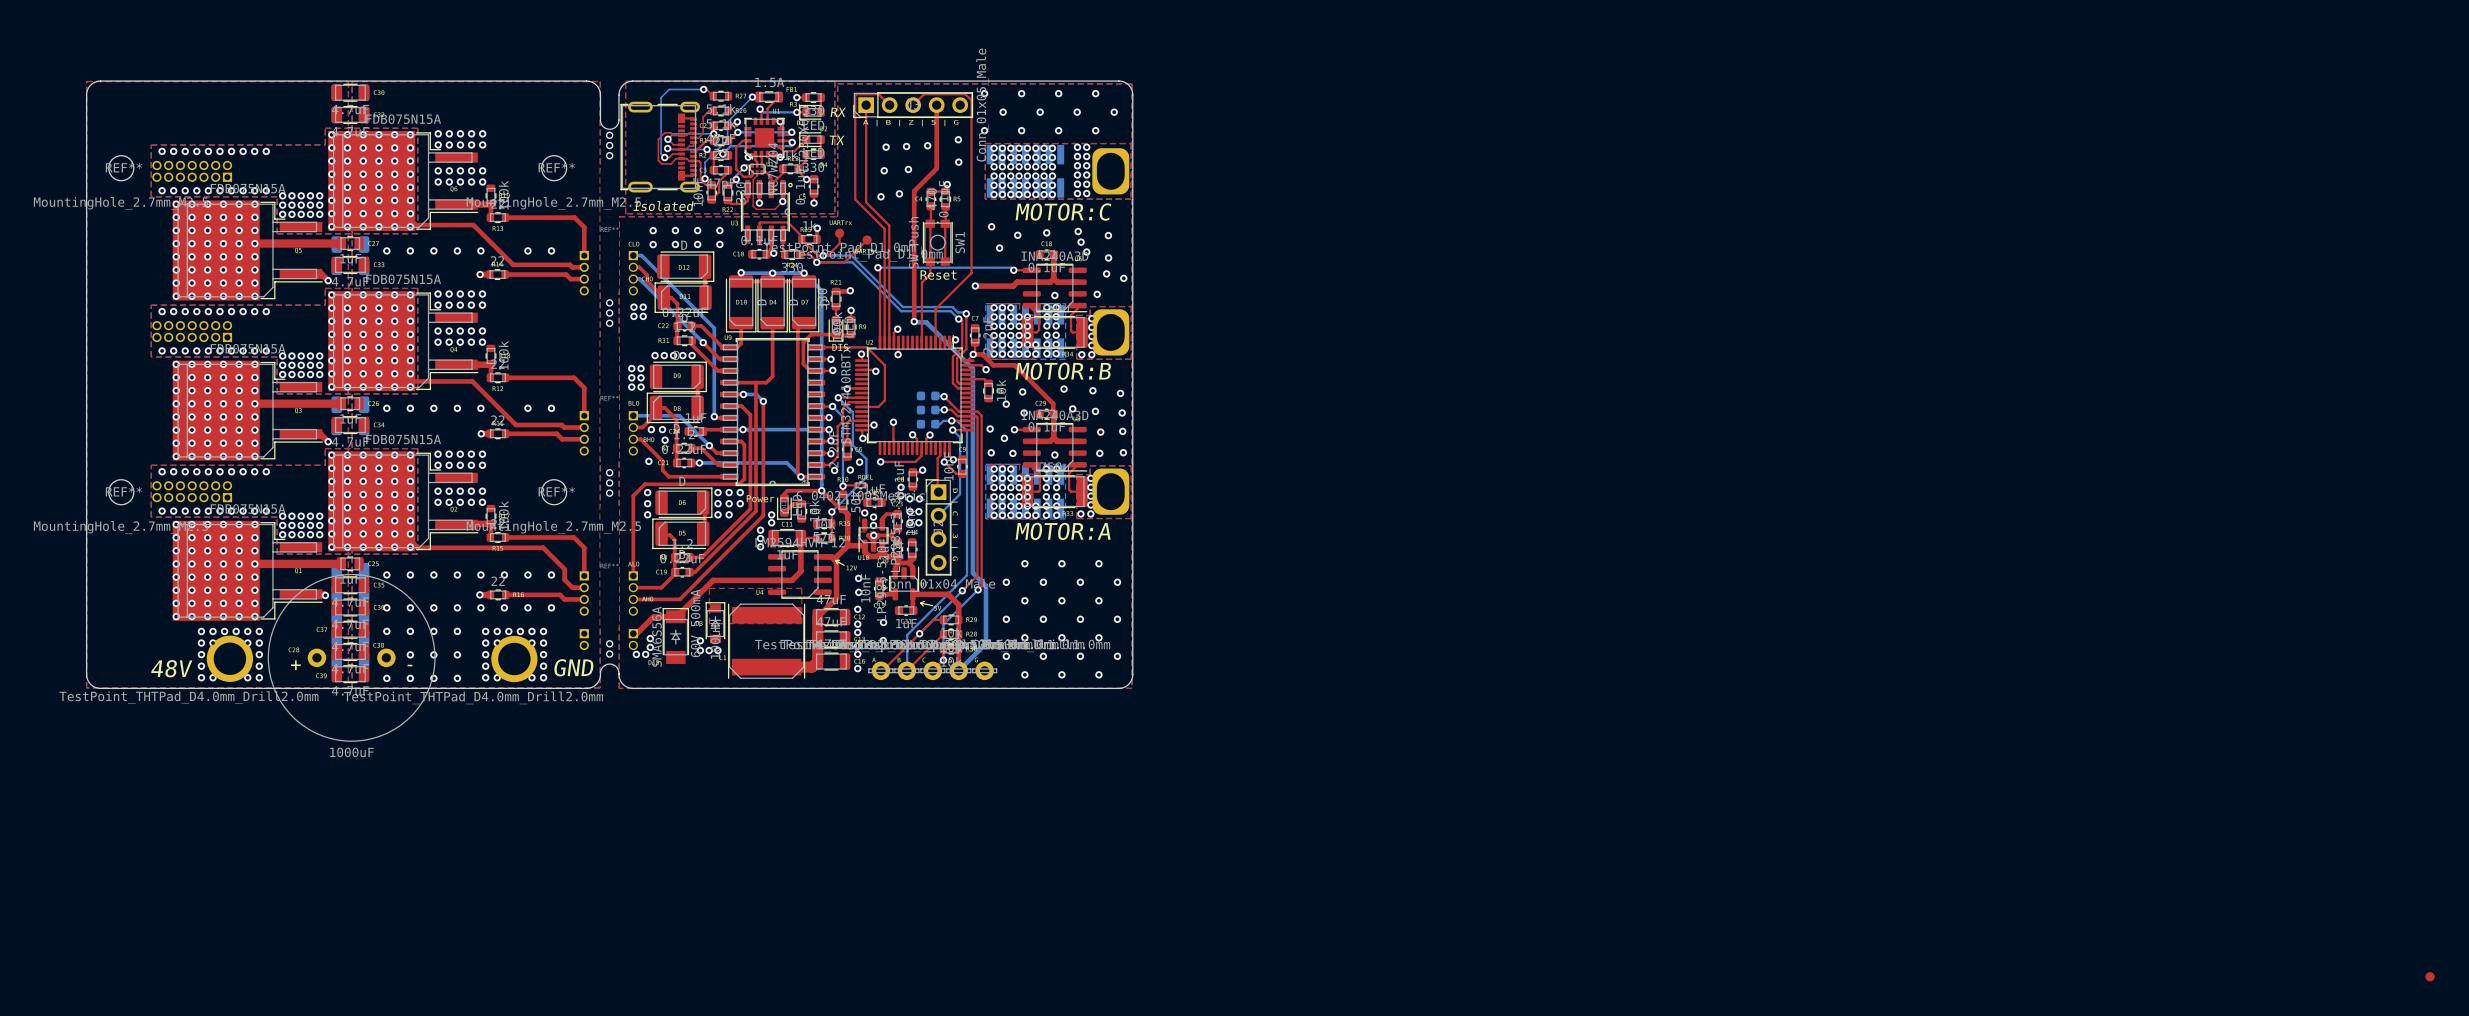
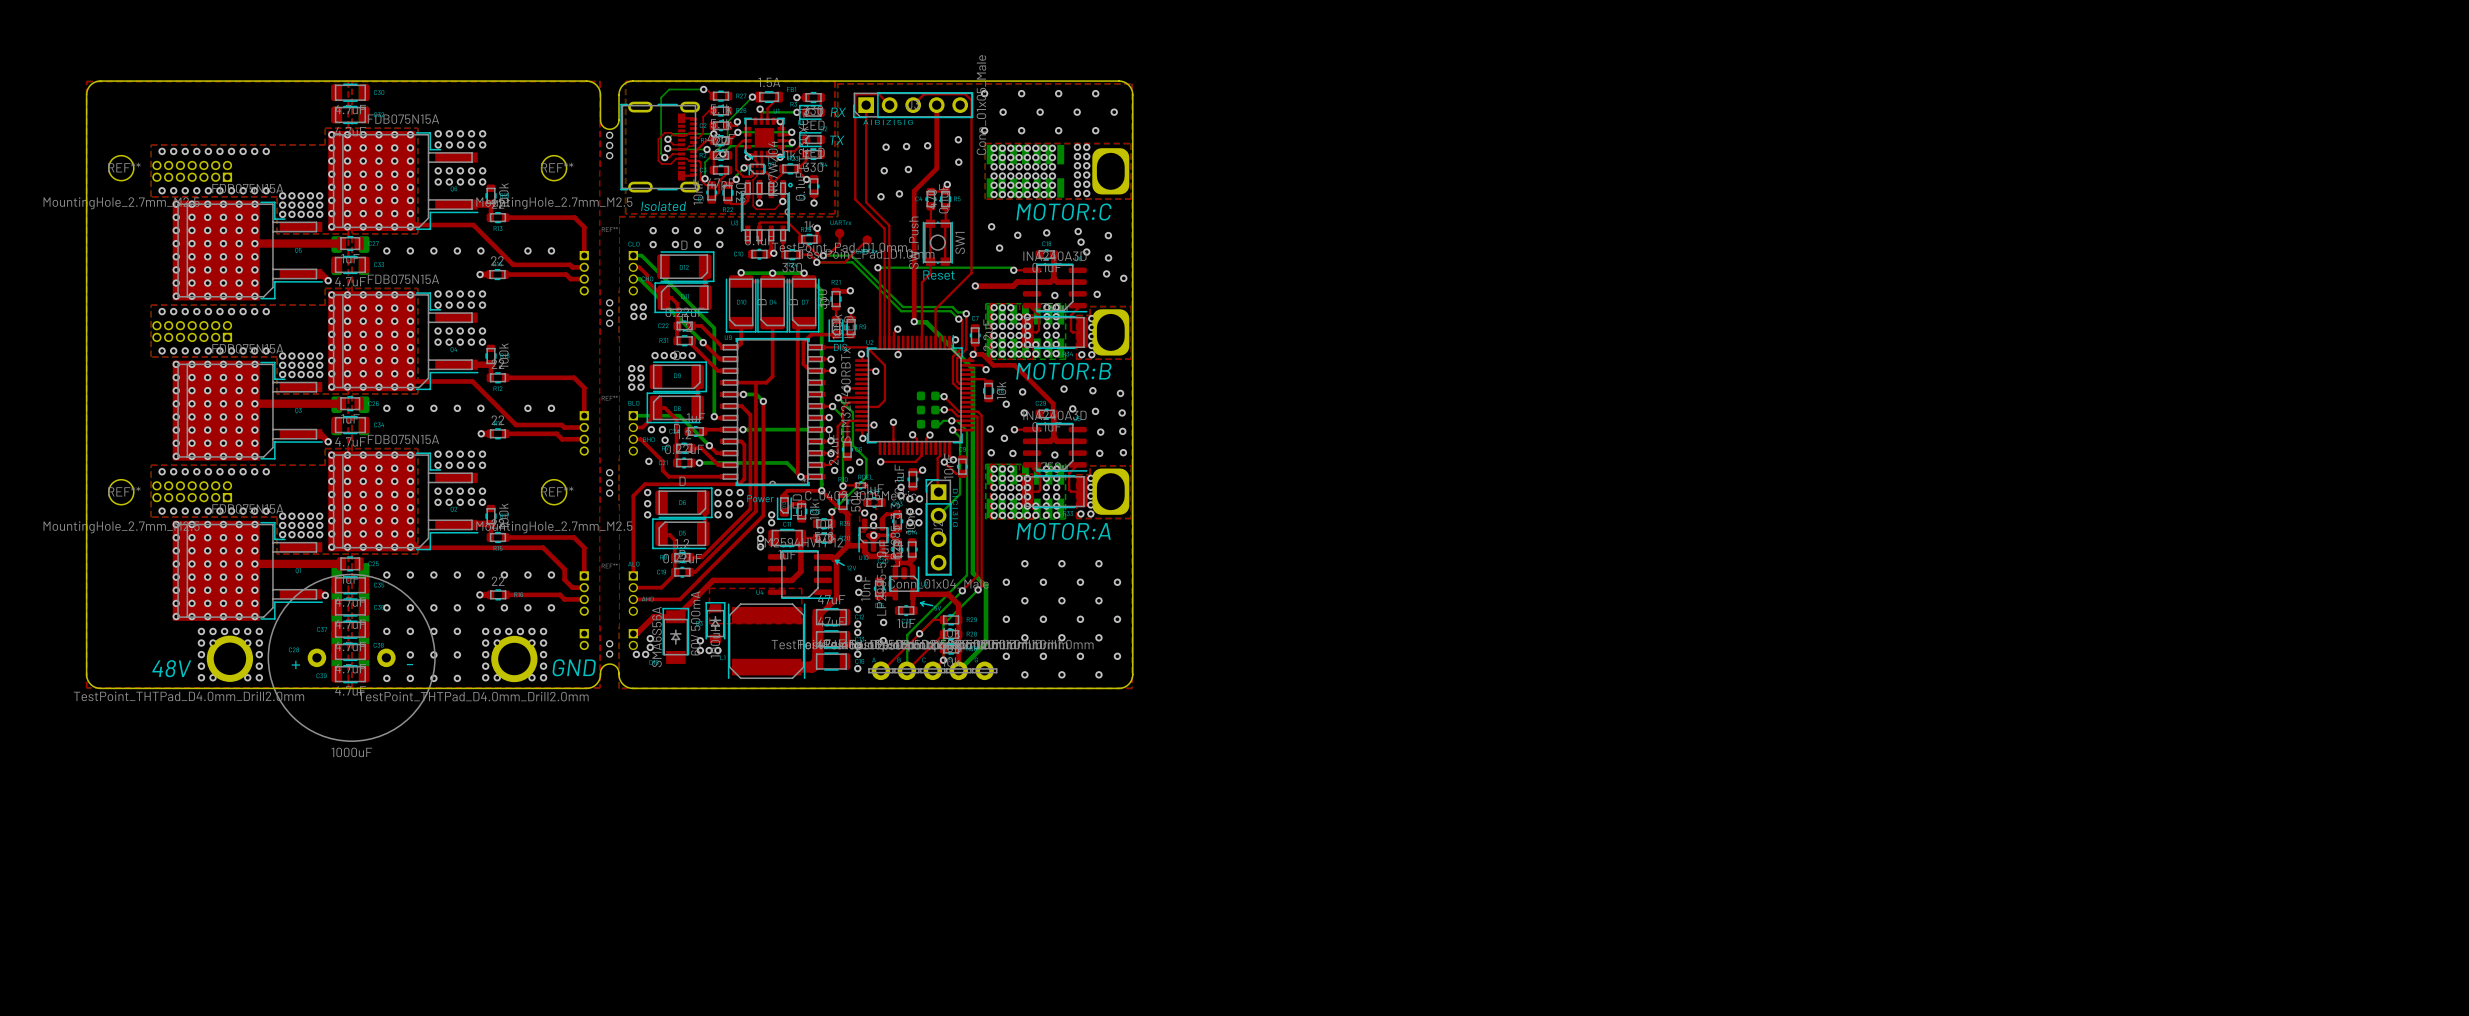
part: (2430, 976) -> none

